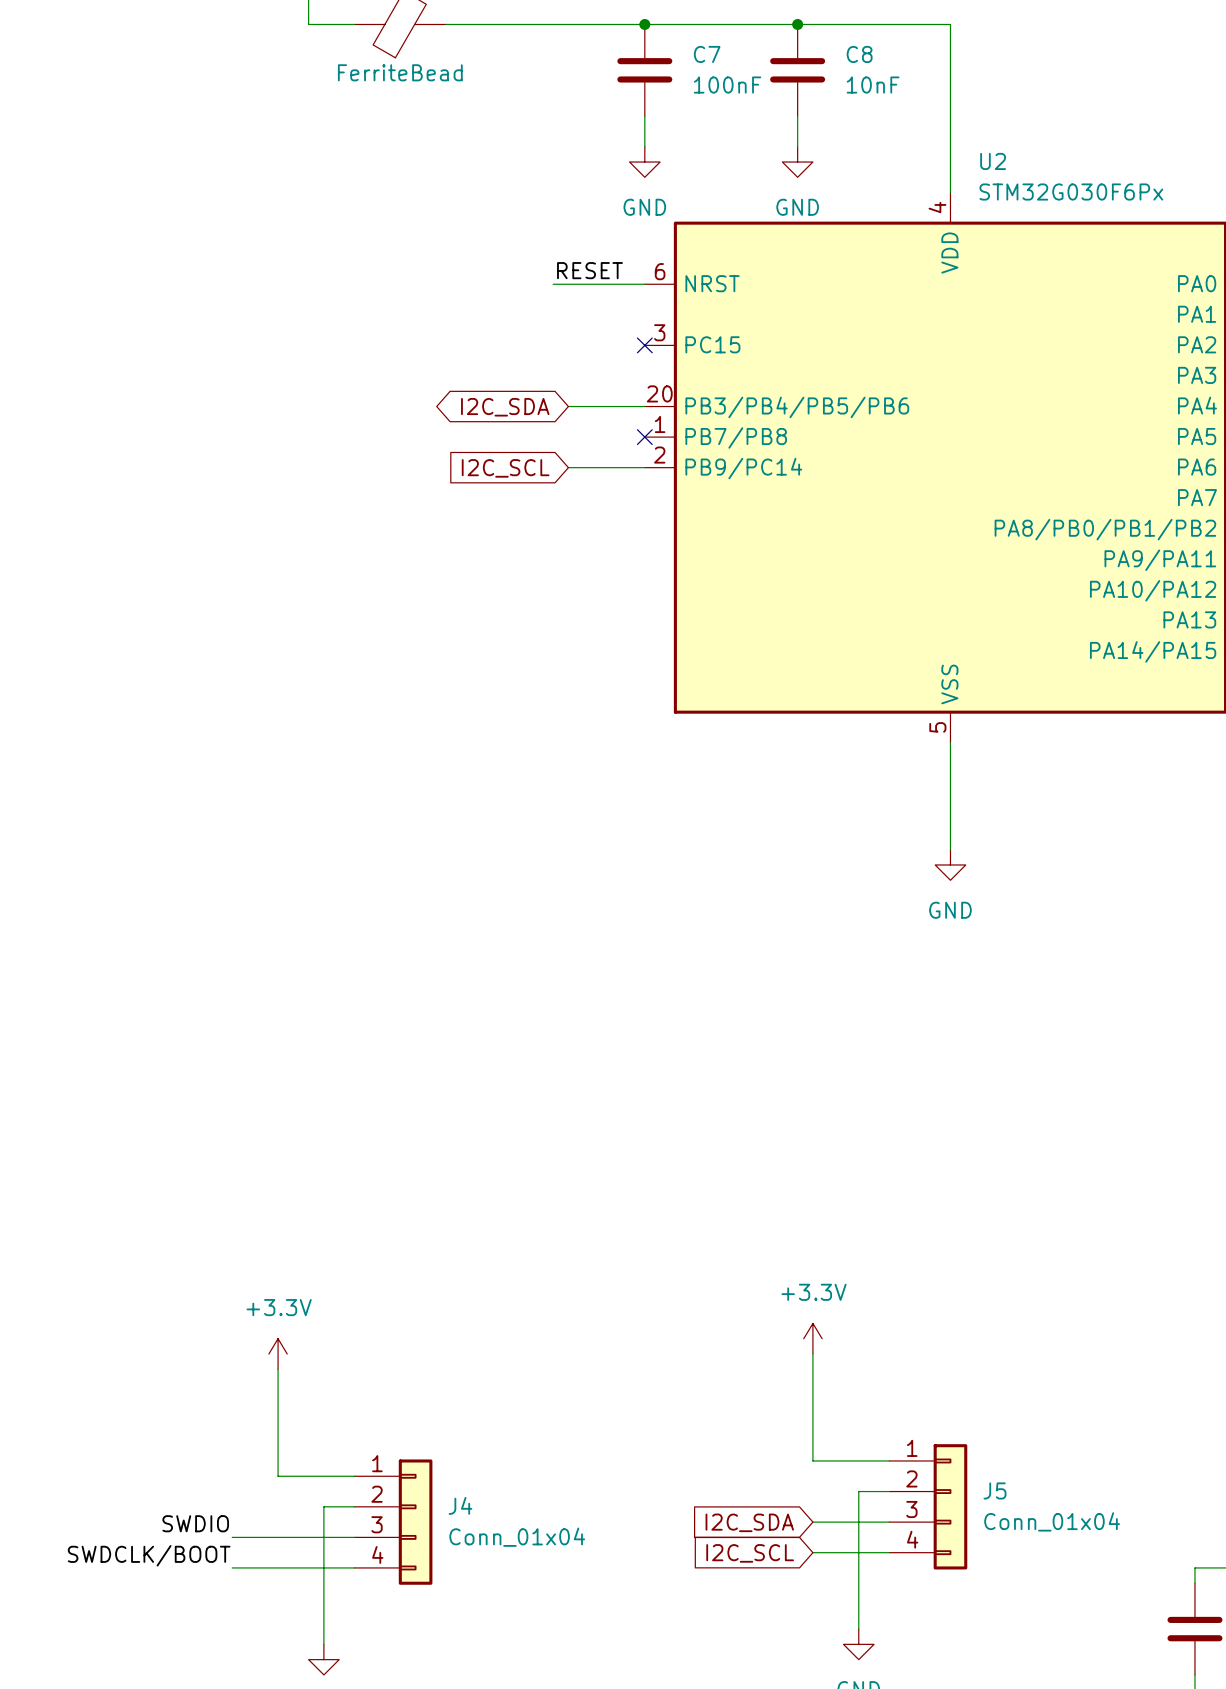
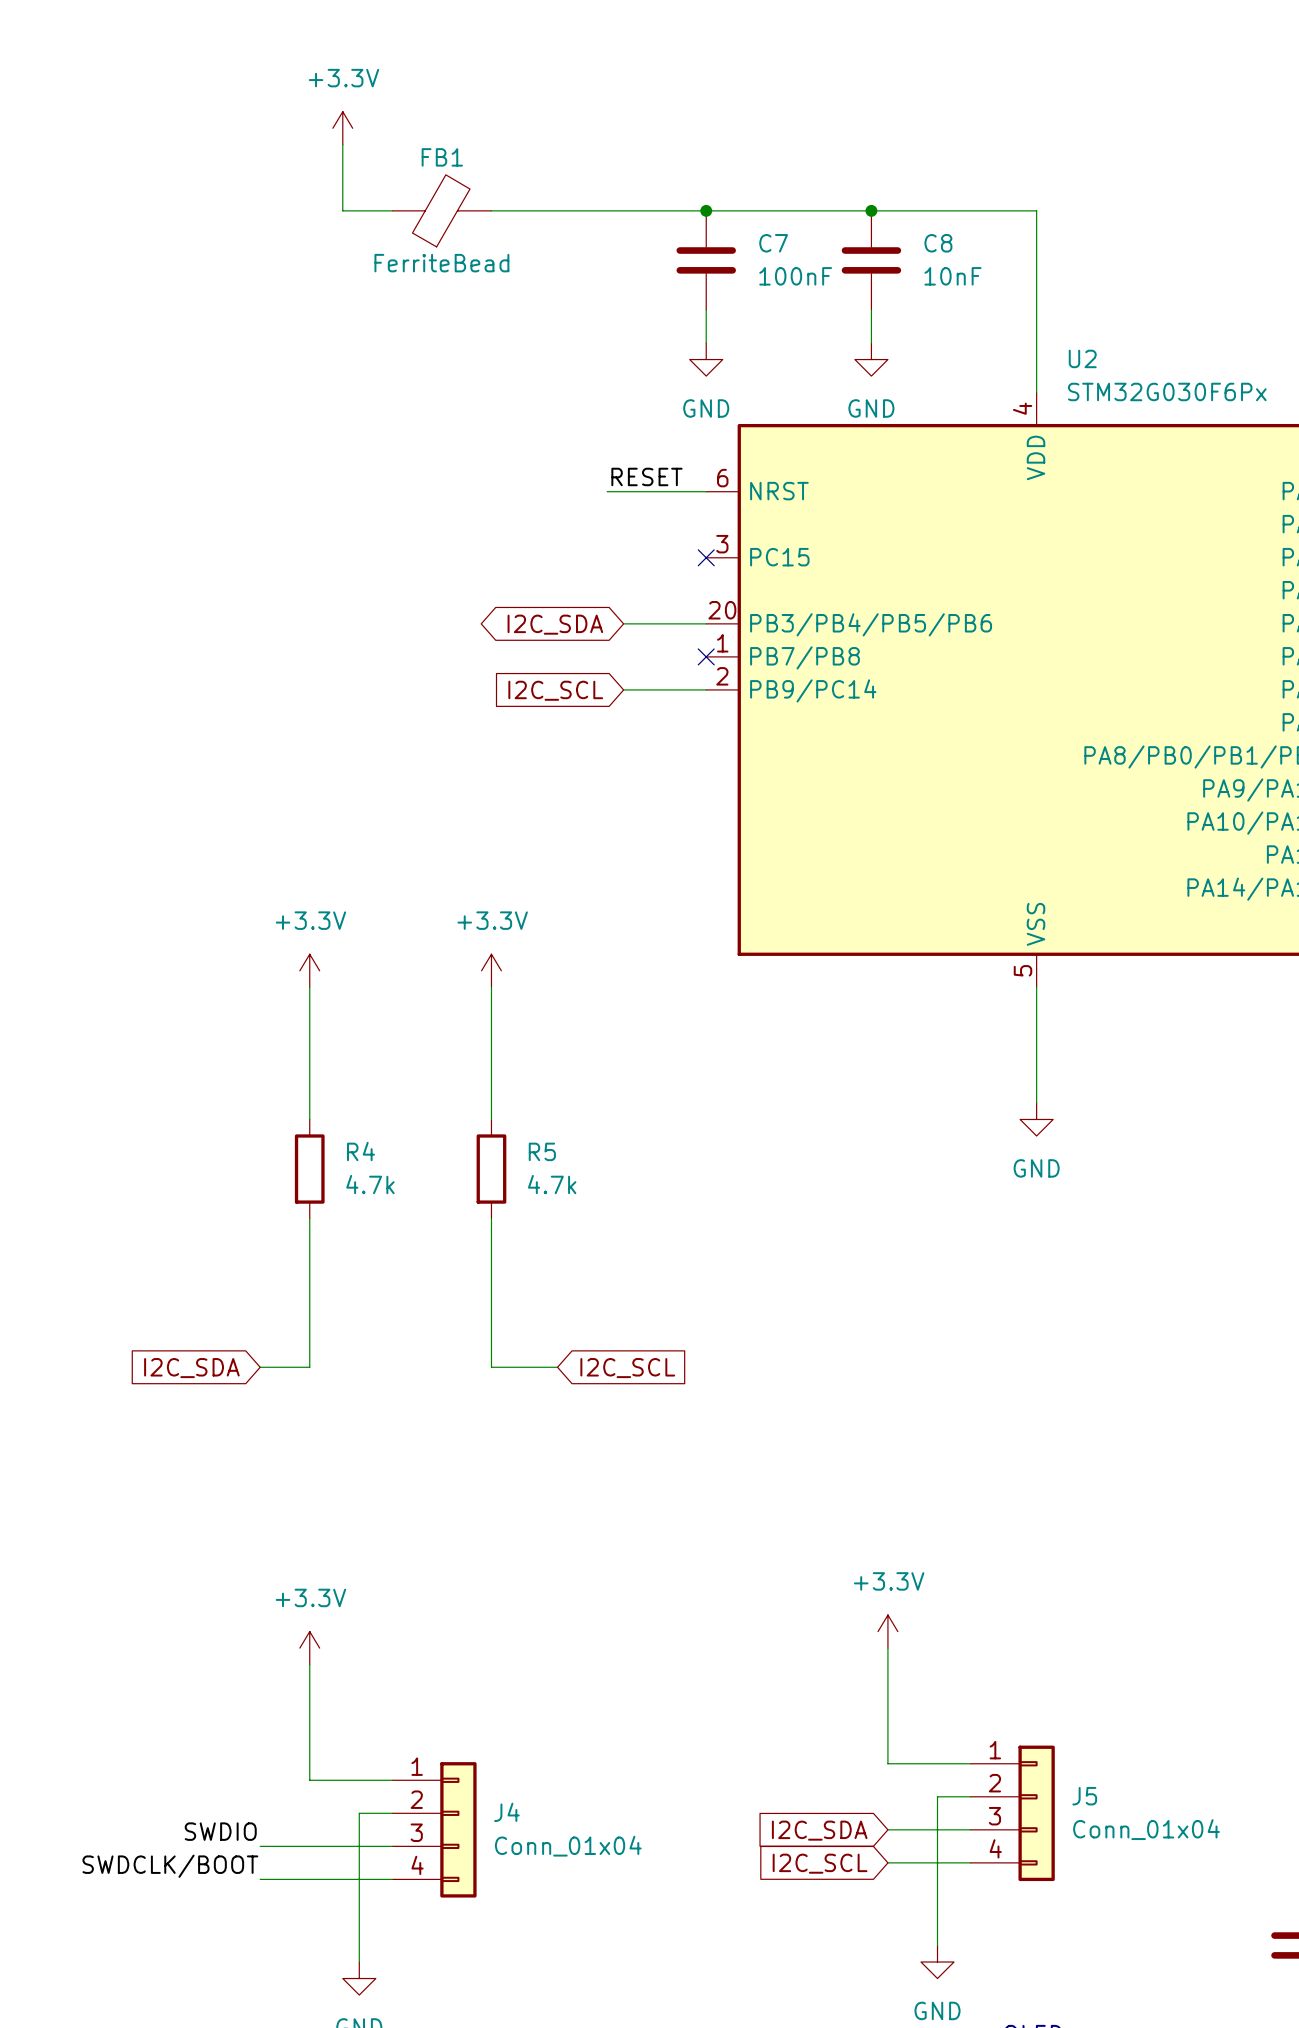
power symbol: none -> +3.3V (309, 970)
power symbol: none -> +3.3V (491, 970)
wire: none -> (309, 987) (309, 1119)
wire: none -> (491, 987) (491, 1119)
R4: none -> 4.7k (309, 1169)
R5: none -> 4.7k (491, 1169)
wire: none -> (309, 1218) (309, 1367) (260, 1367)
wire: none -> (491, 1218) (491, 1367) (557, 1367)
global label: none -> I2C_SDA (191, 1368)
global label: none -> I2C_SCL (627, 1368)

